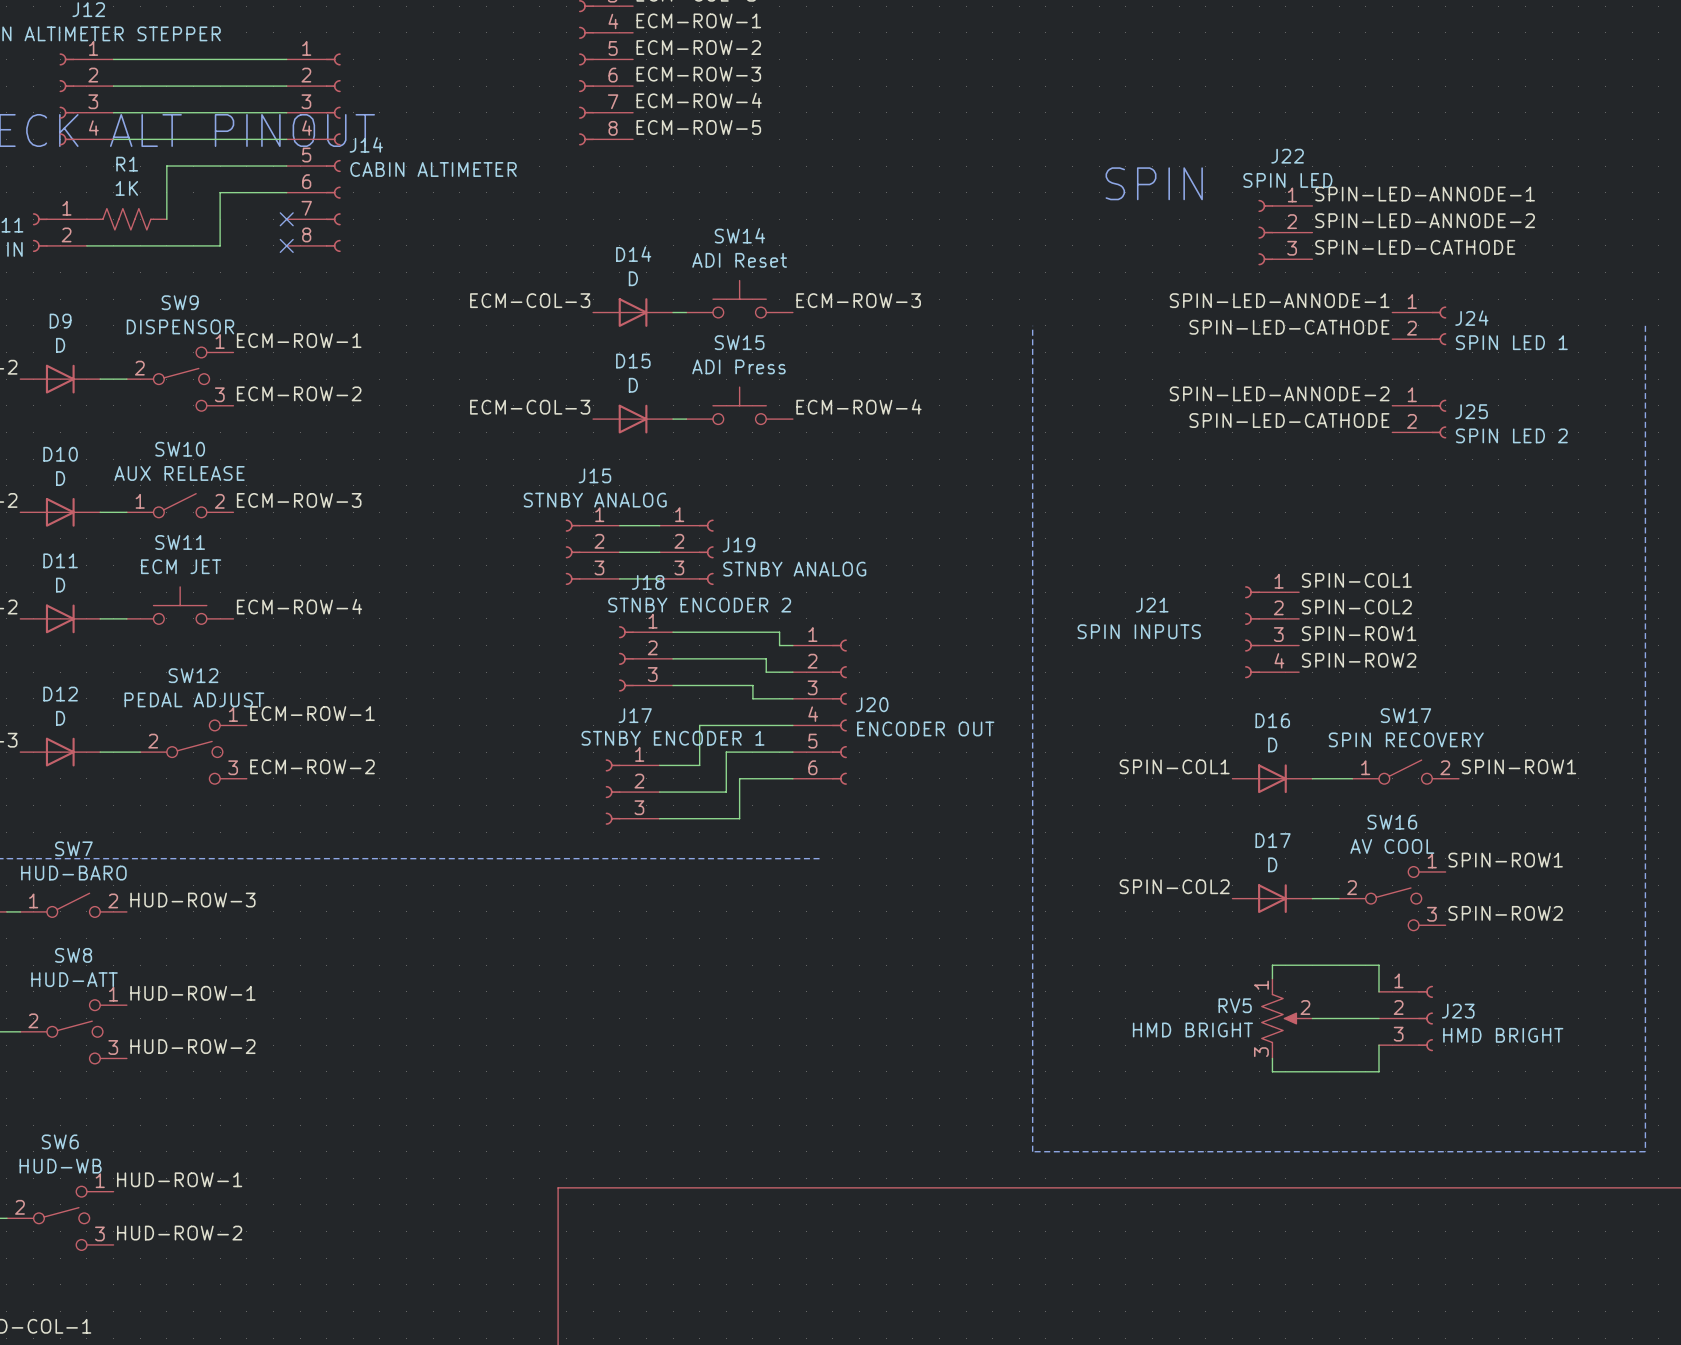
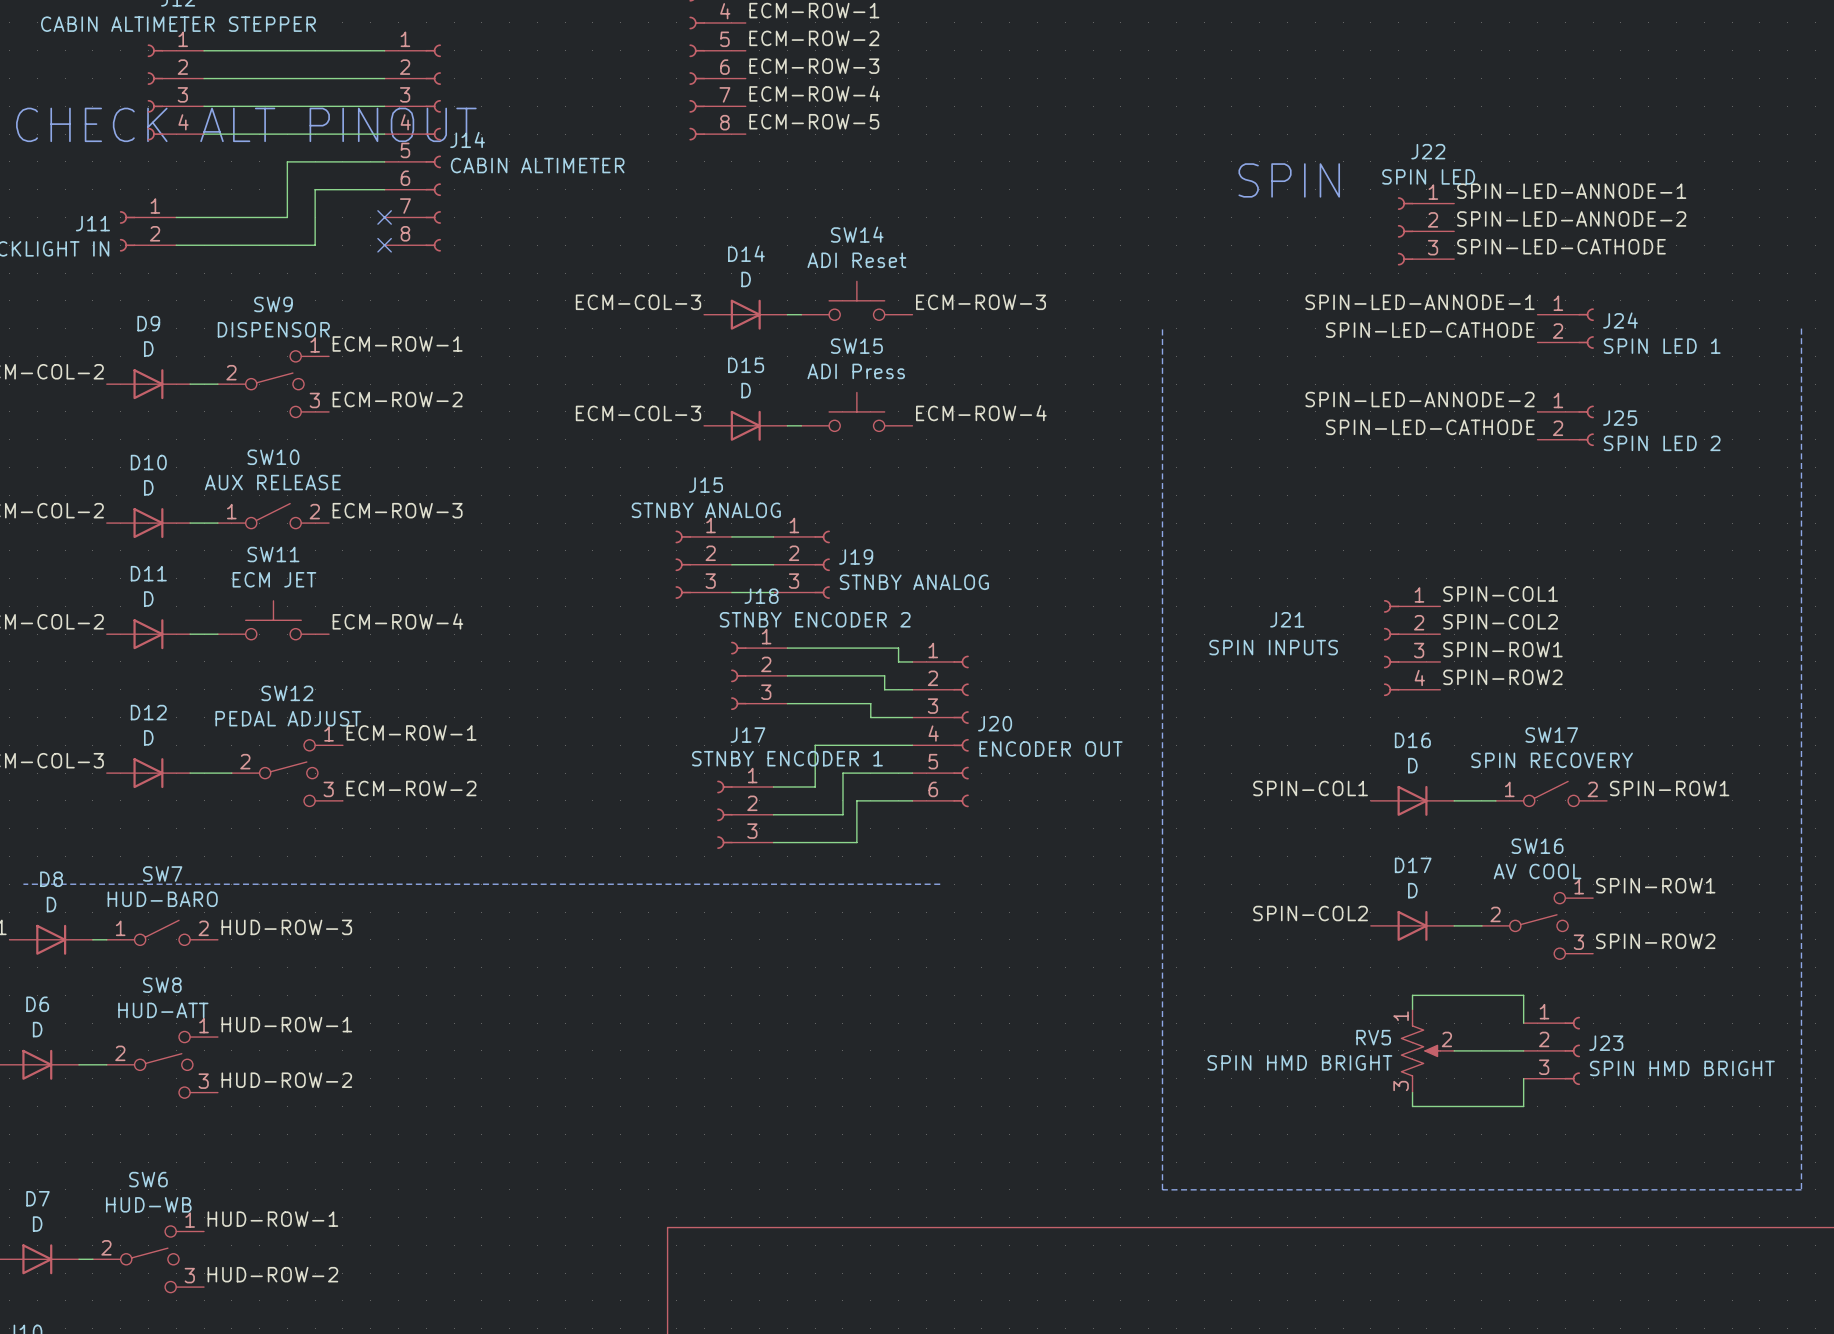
wire: (193, 166) (166, 166) (166, 219) -> (287, 161) (287, 217) (176, 217)
R1: 1K (126, 219) -> none
RV5 value: HMD BRIGHT (1192, 1030) -> SPIN HMD BRIGHT (1299, 1062)
J23 value: HMD BRIGHT (1503, 1035) -> SPIN HMD BRIGHT (1682, 1068)

